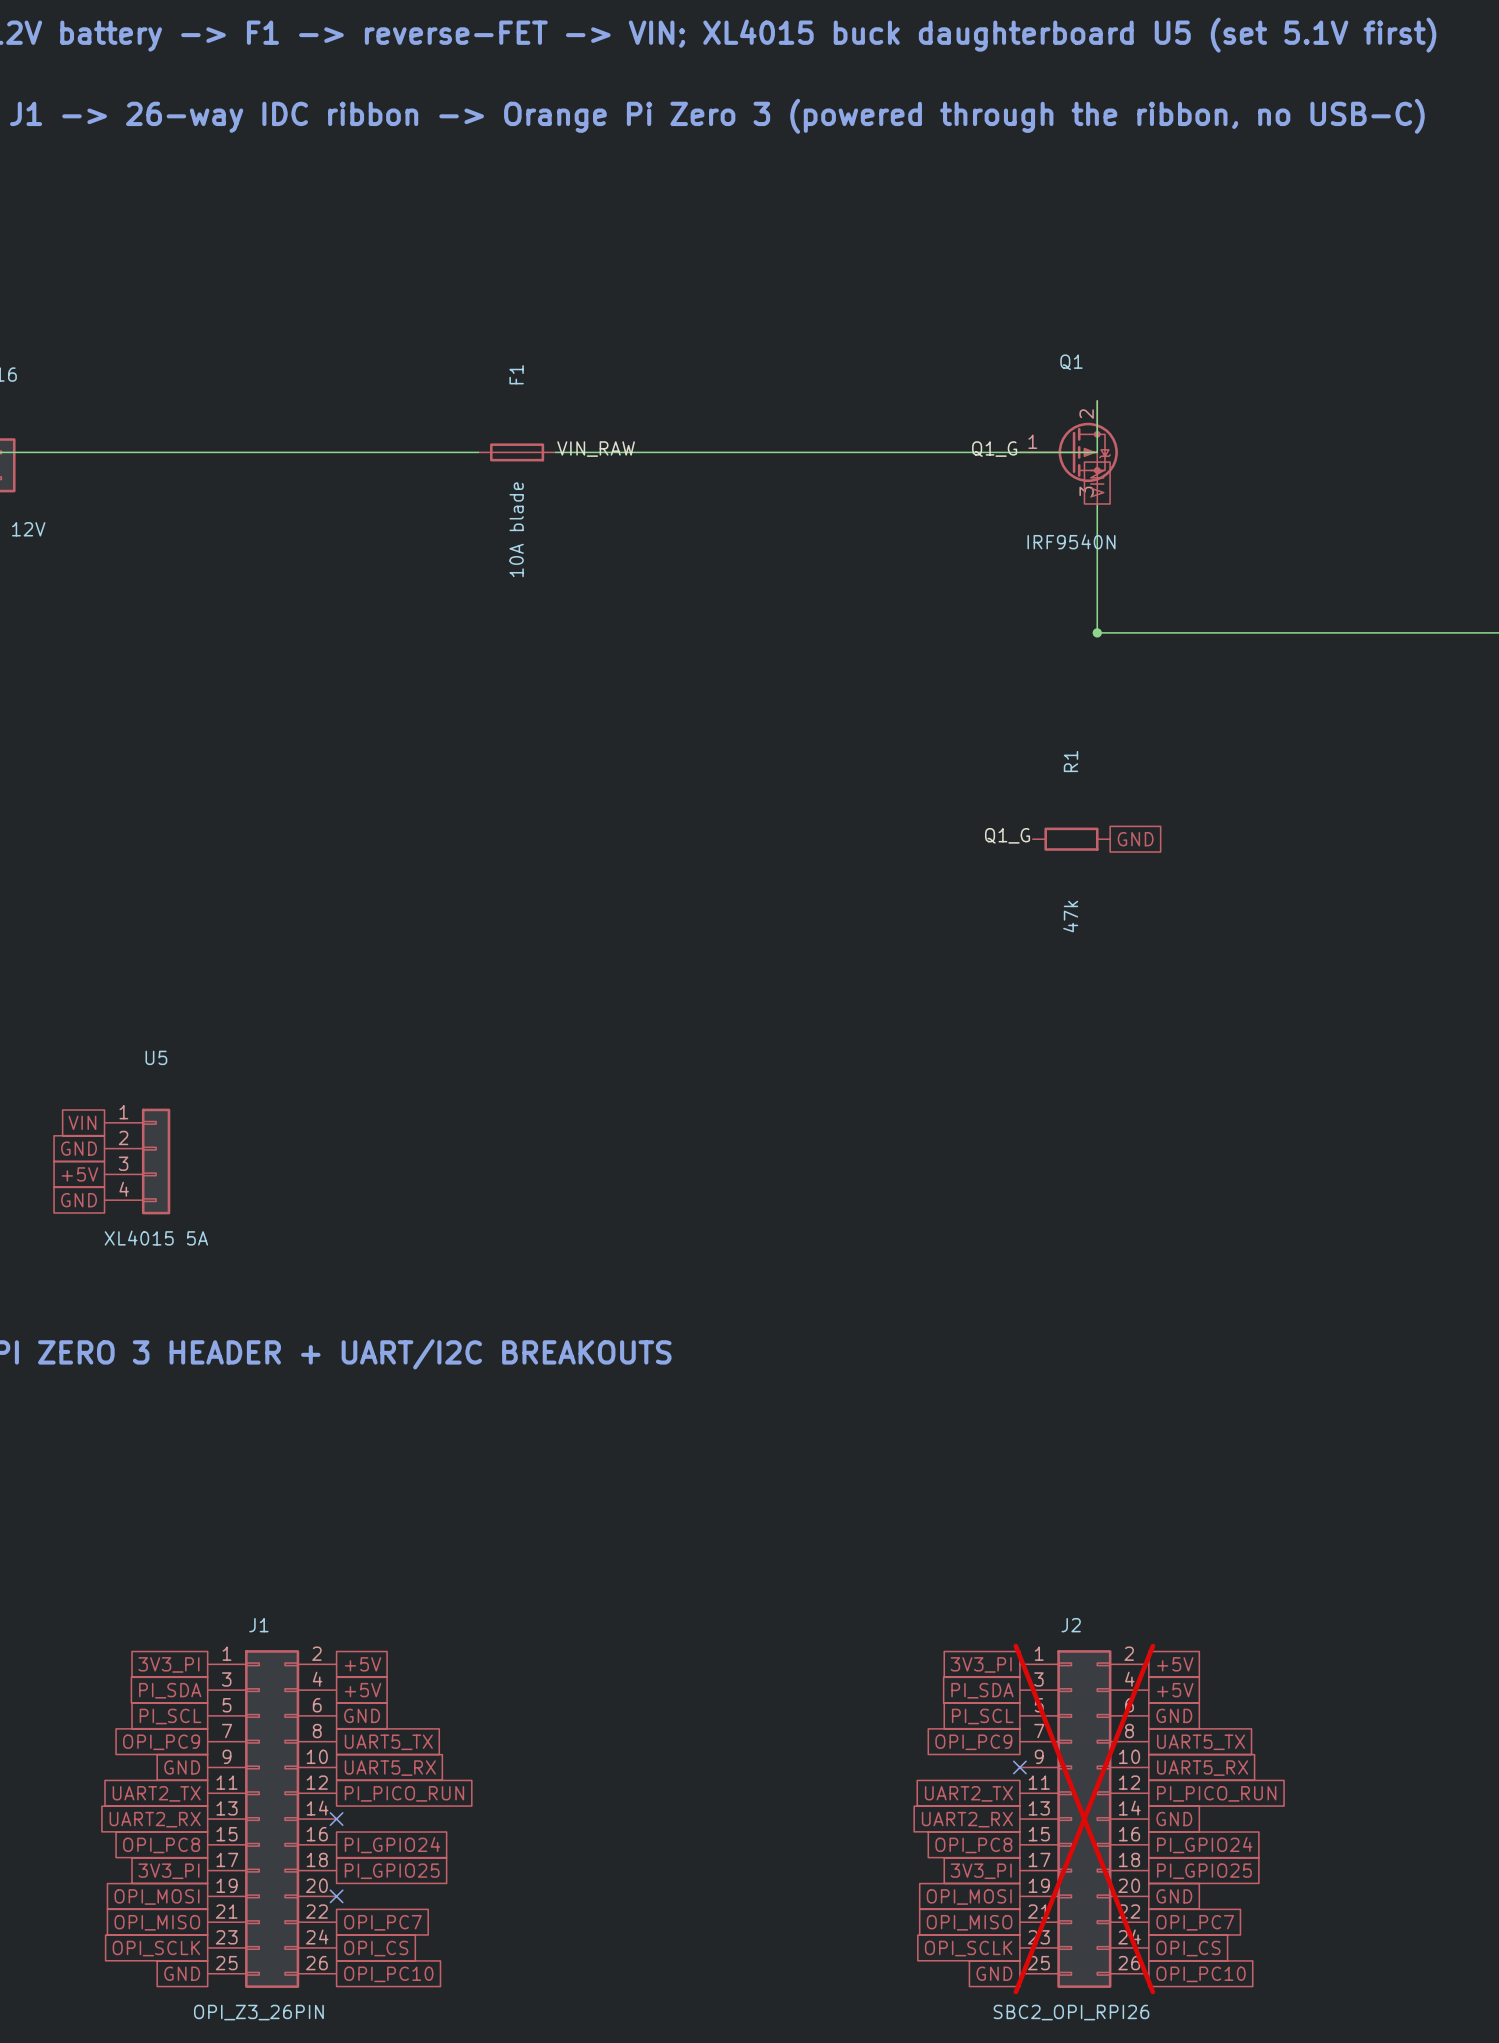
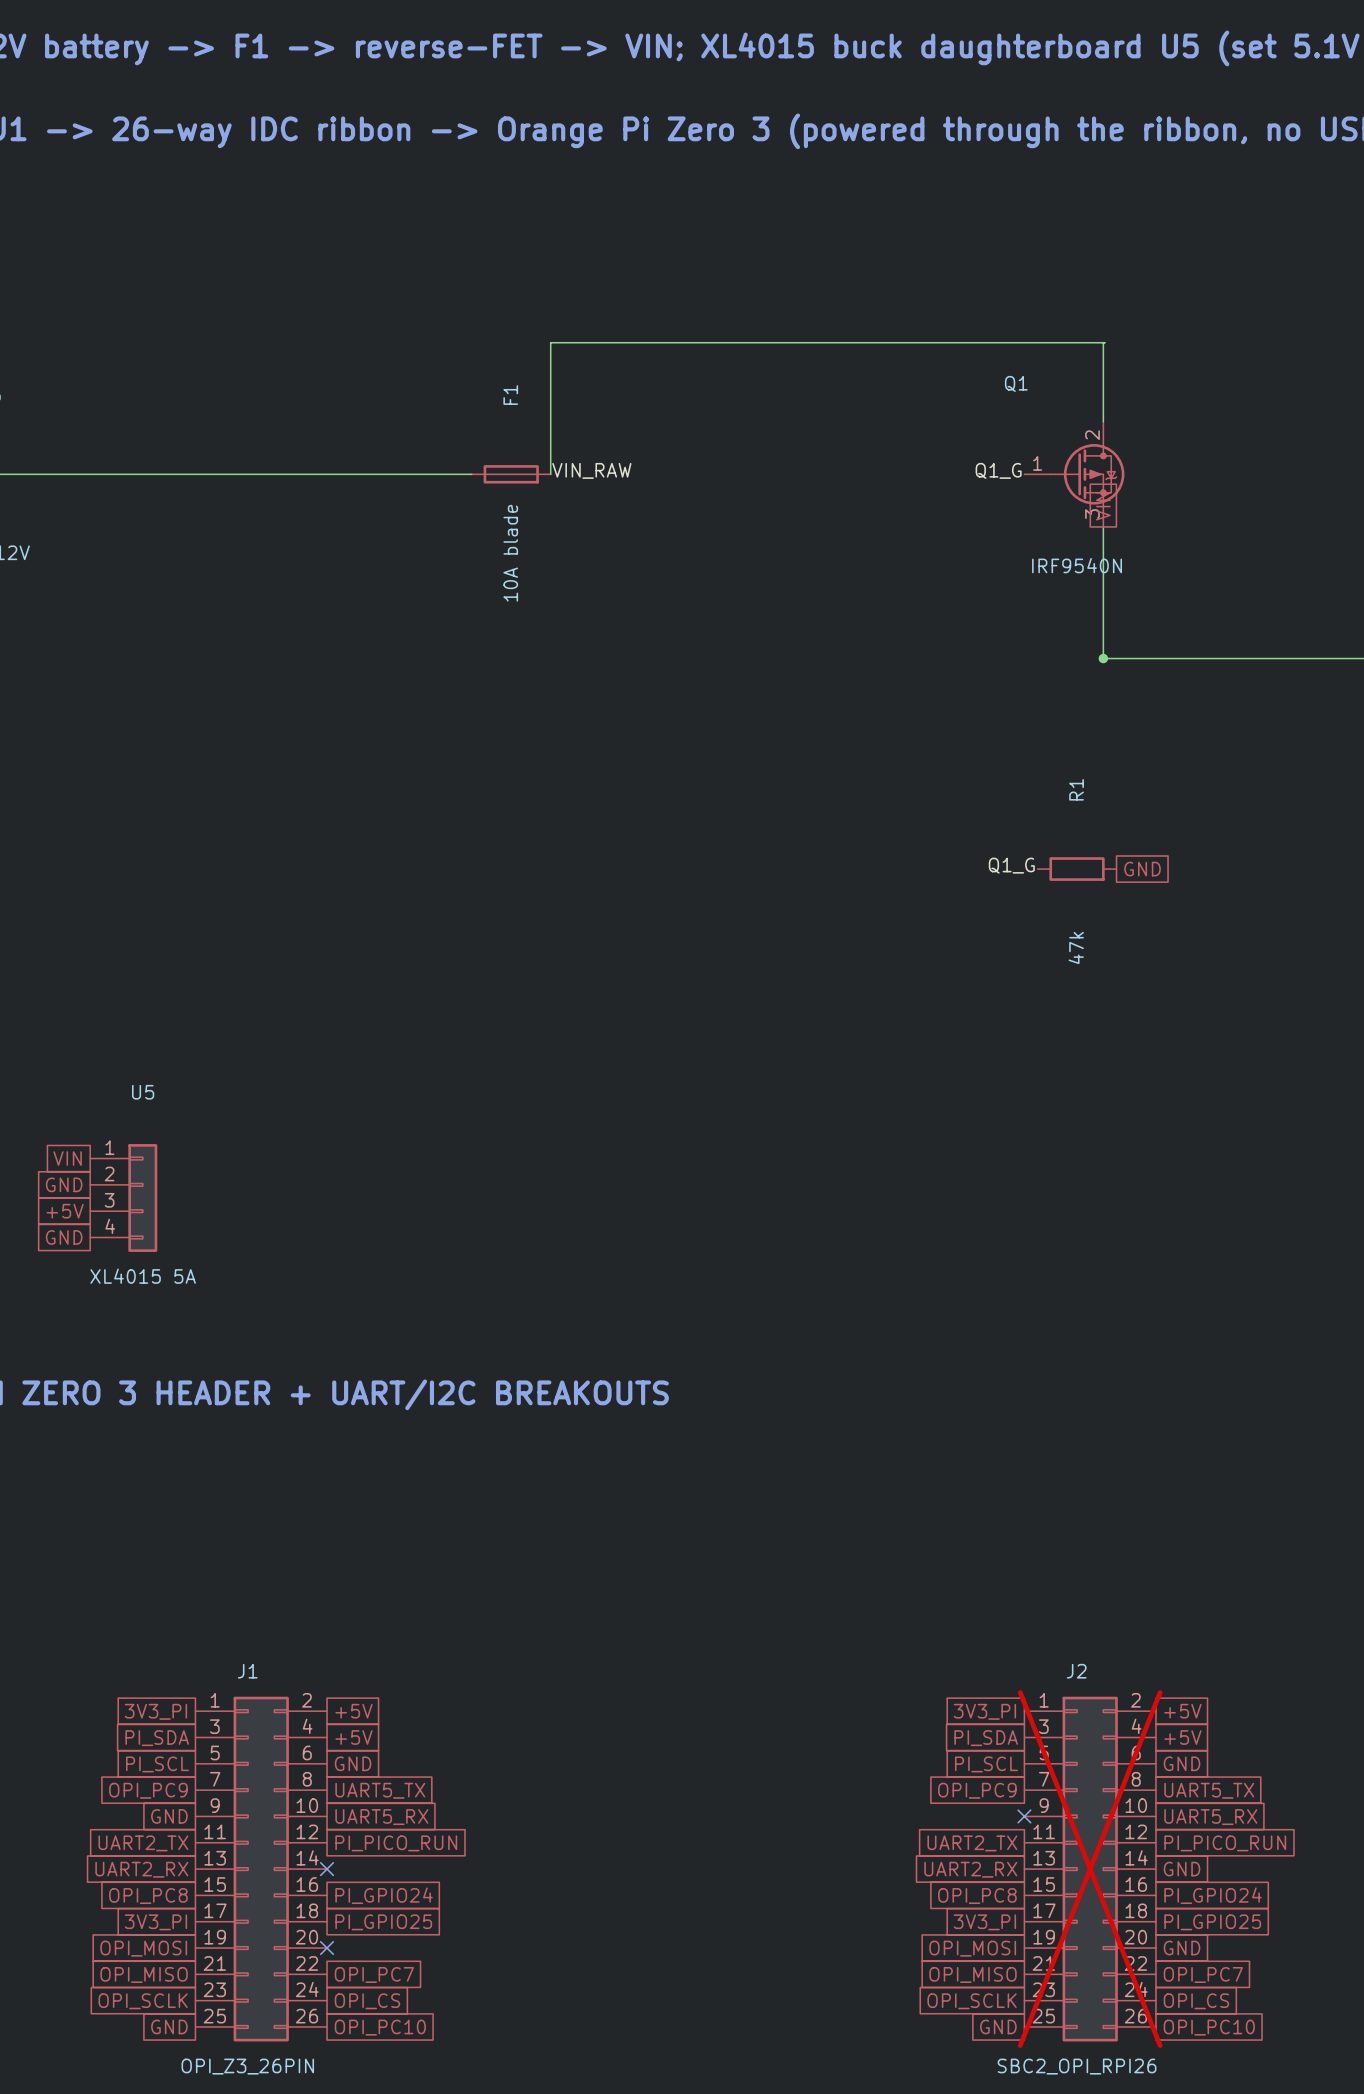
wire: none -> (1103, 342) (1103, 421)
Q1 name position: Q1 (1071, 362) -> Q1 (1016, 383)
wire: (1097, 400) (1097, 452) (555, 452) -> (1104, 342) (550, 342) (550, 474)

